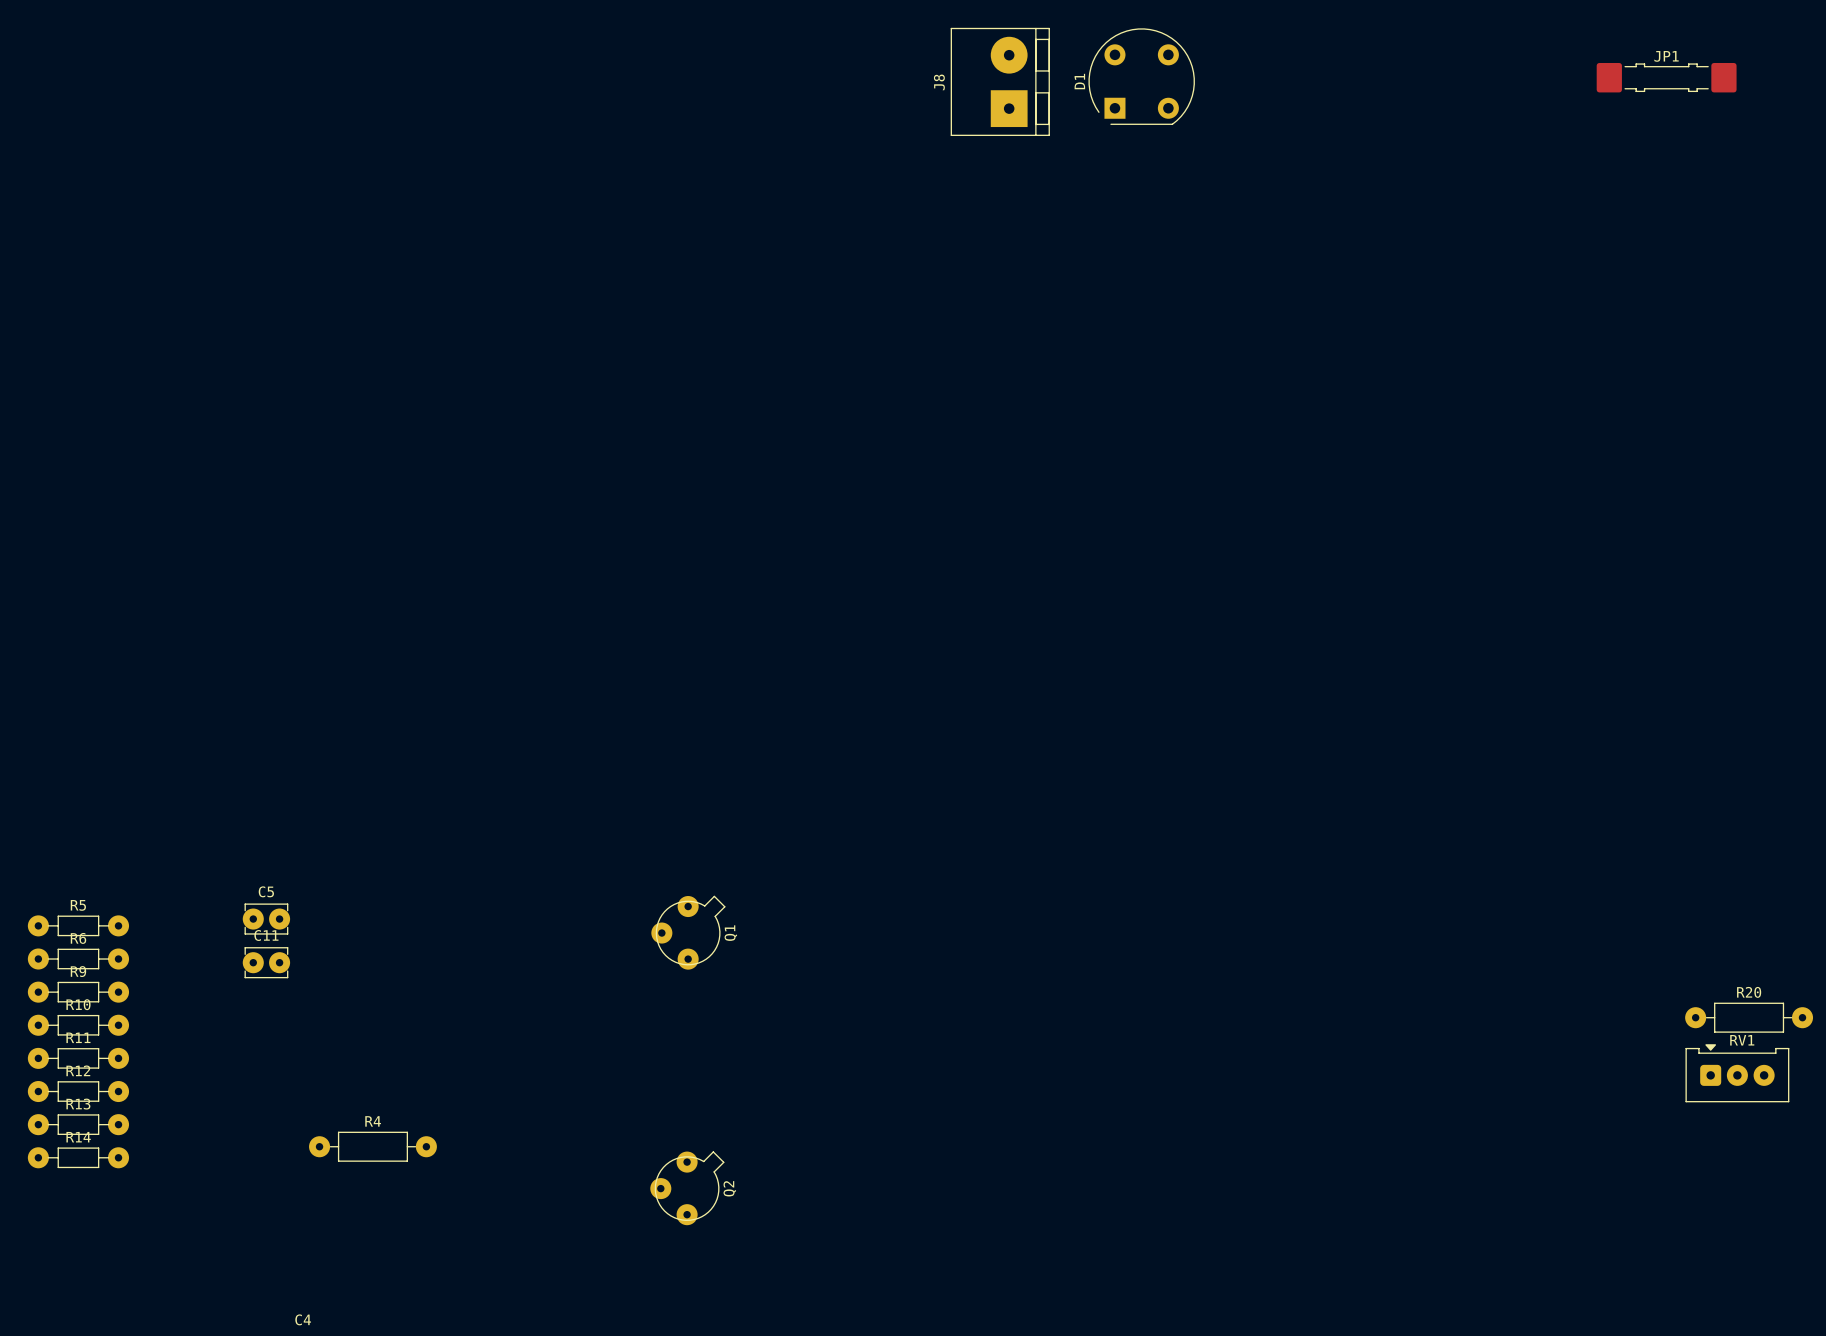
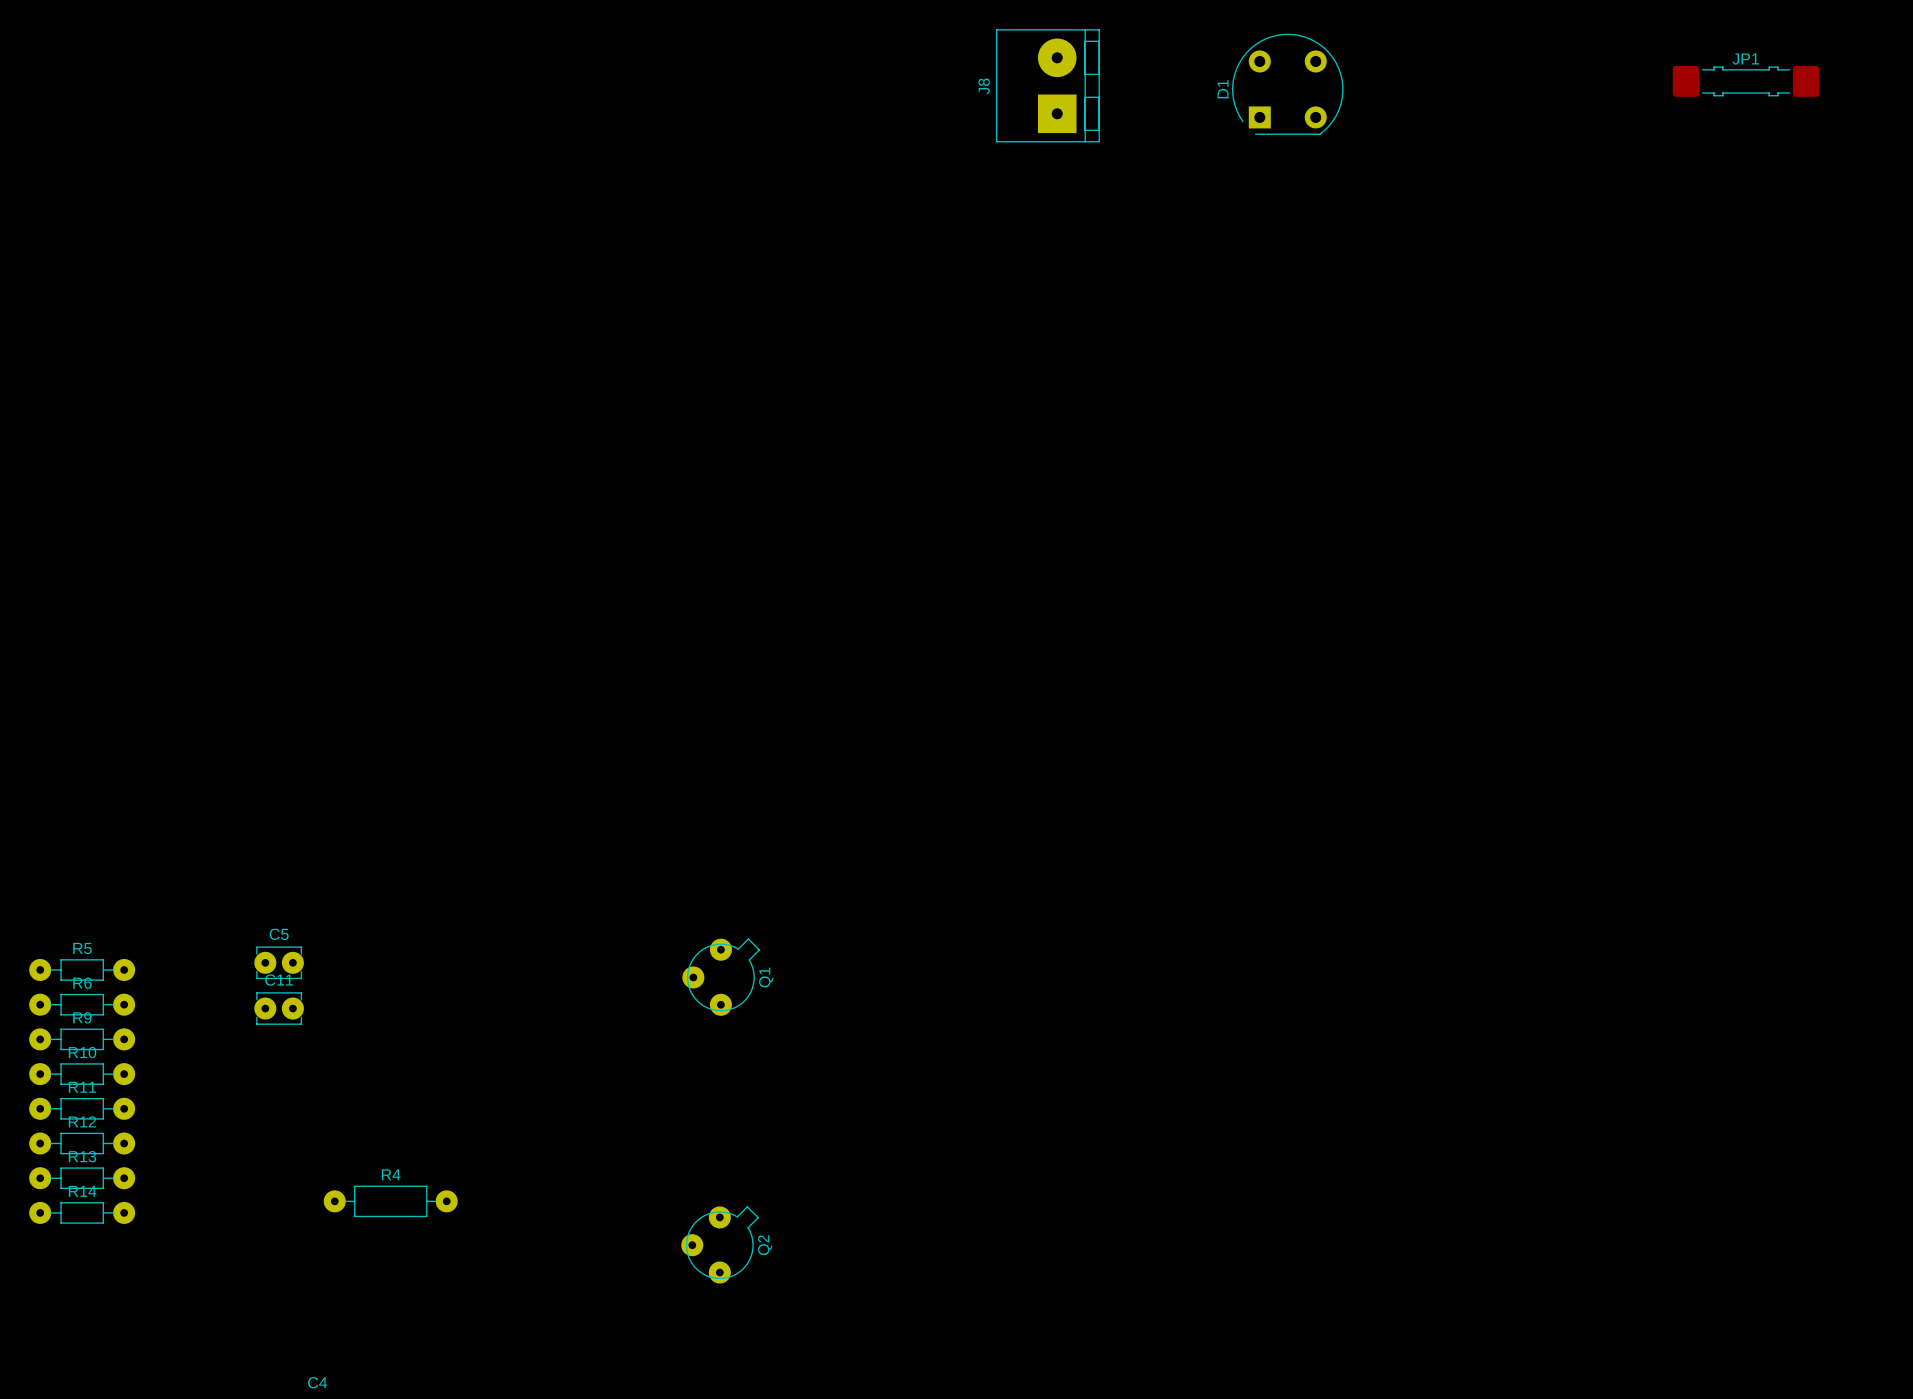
D1 position: (1141, 76) -> (1287, 84)
R20: (1749, 1017) -> none
RV1: (1737, 1073) -> none

